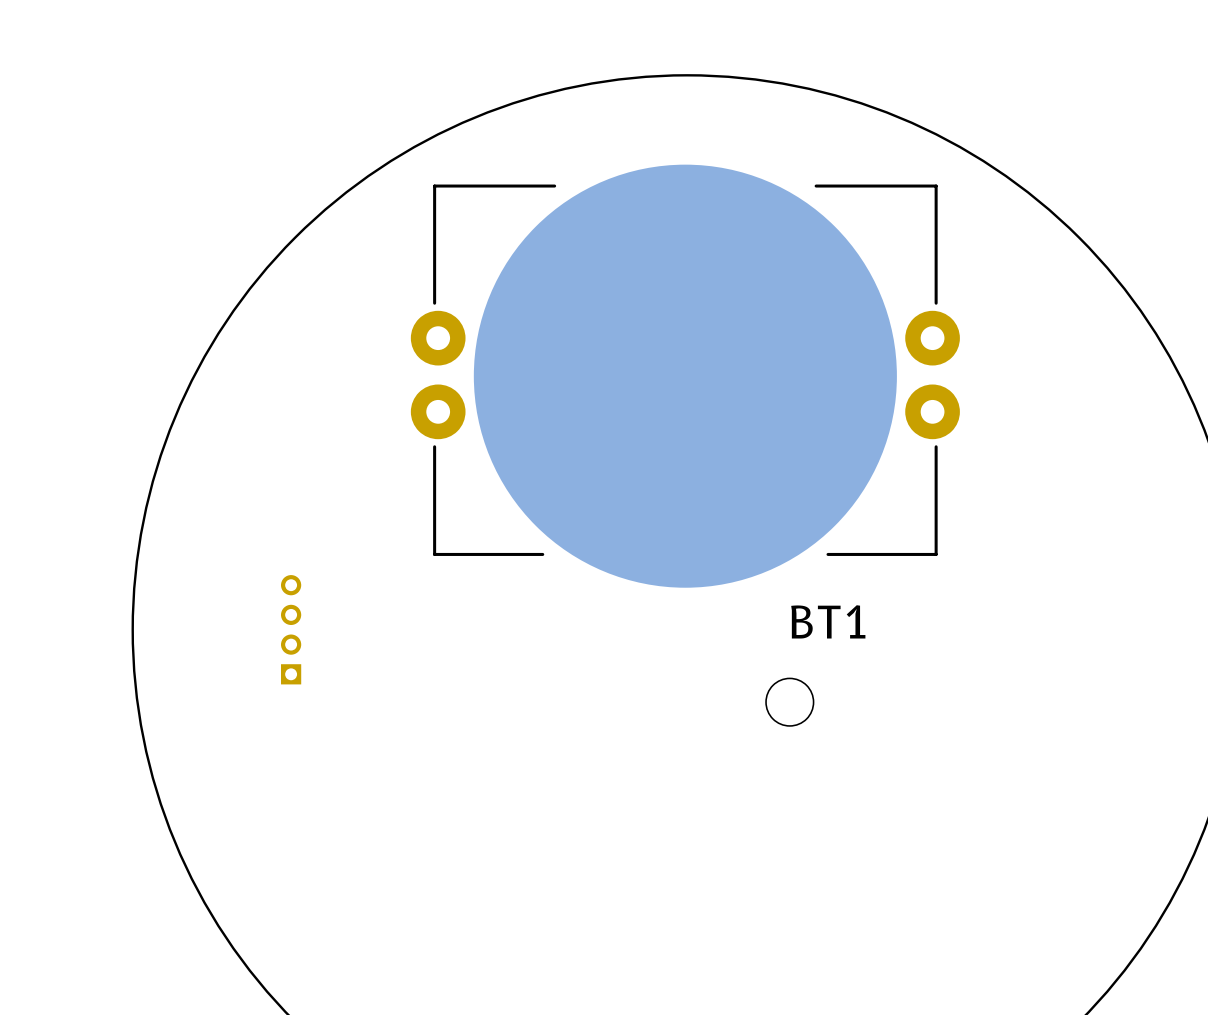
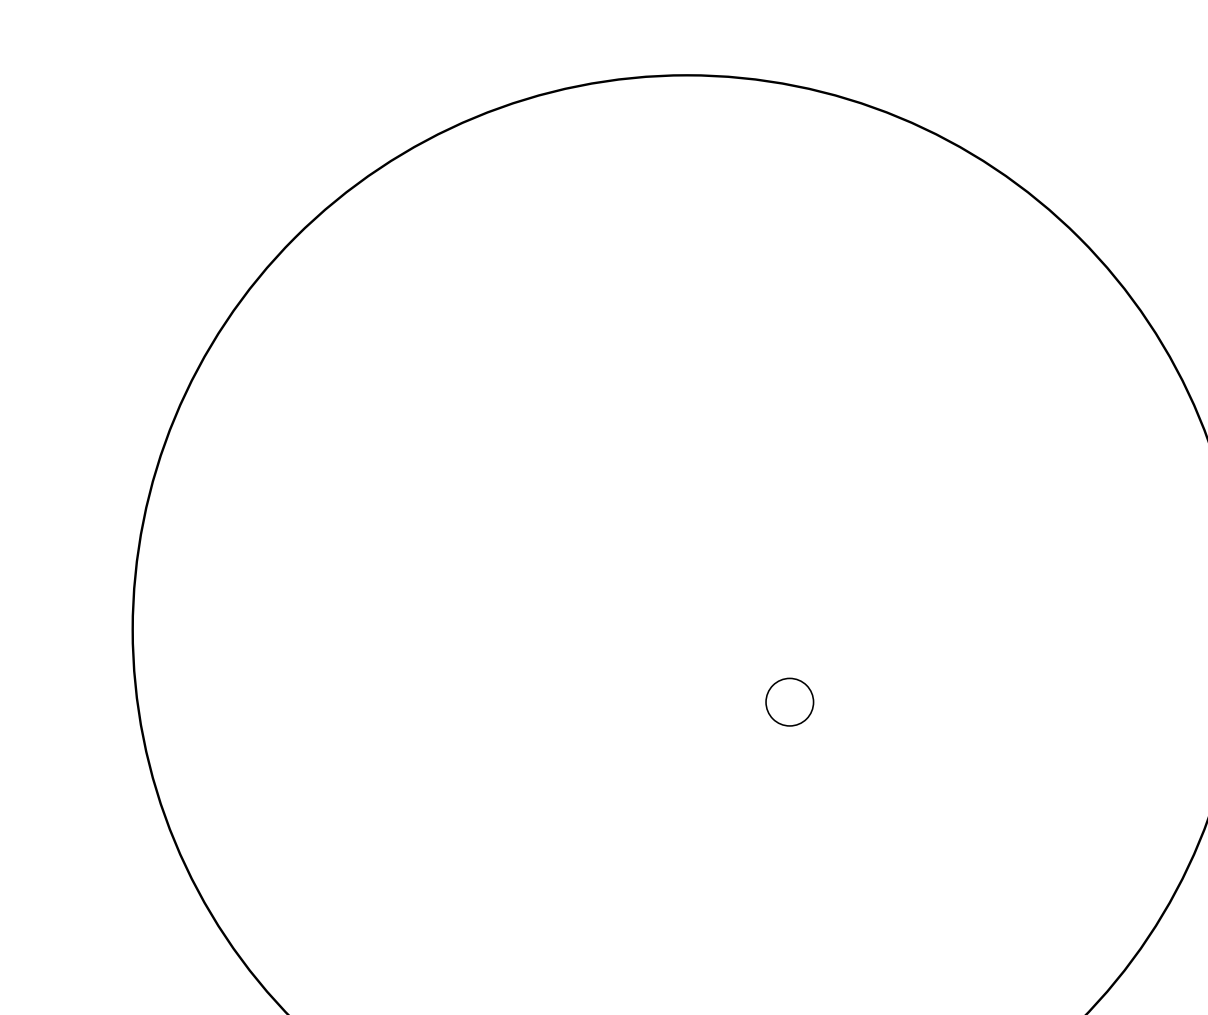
BT1: (685, 376) -> none
part: (291, 629) -> none

